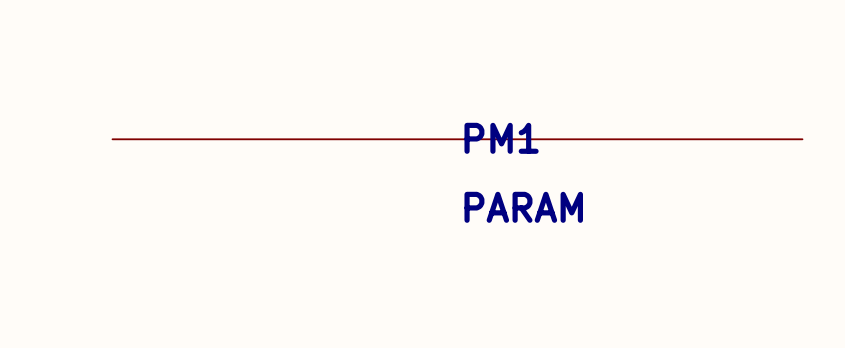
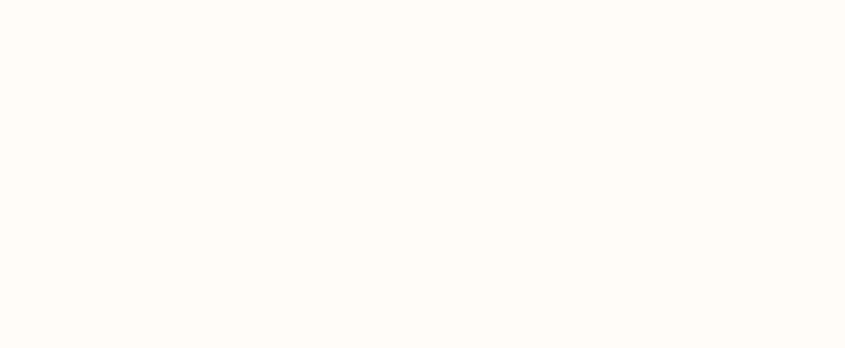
PM1: PARAM (457, 139) -> none

